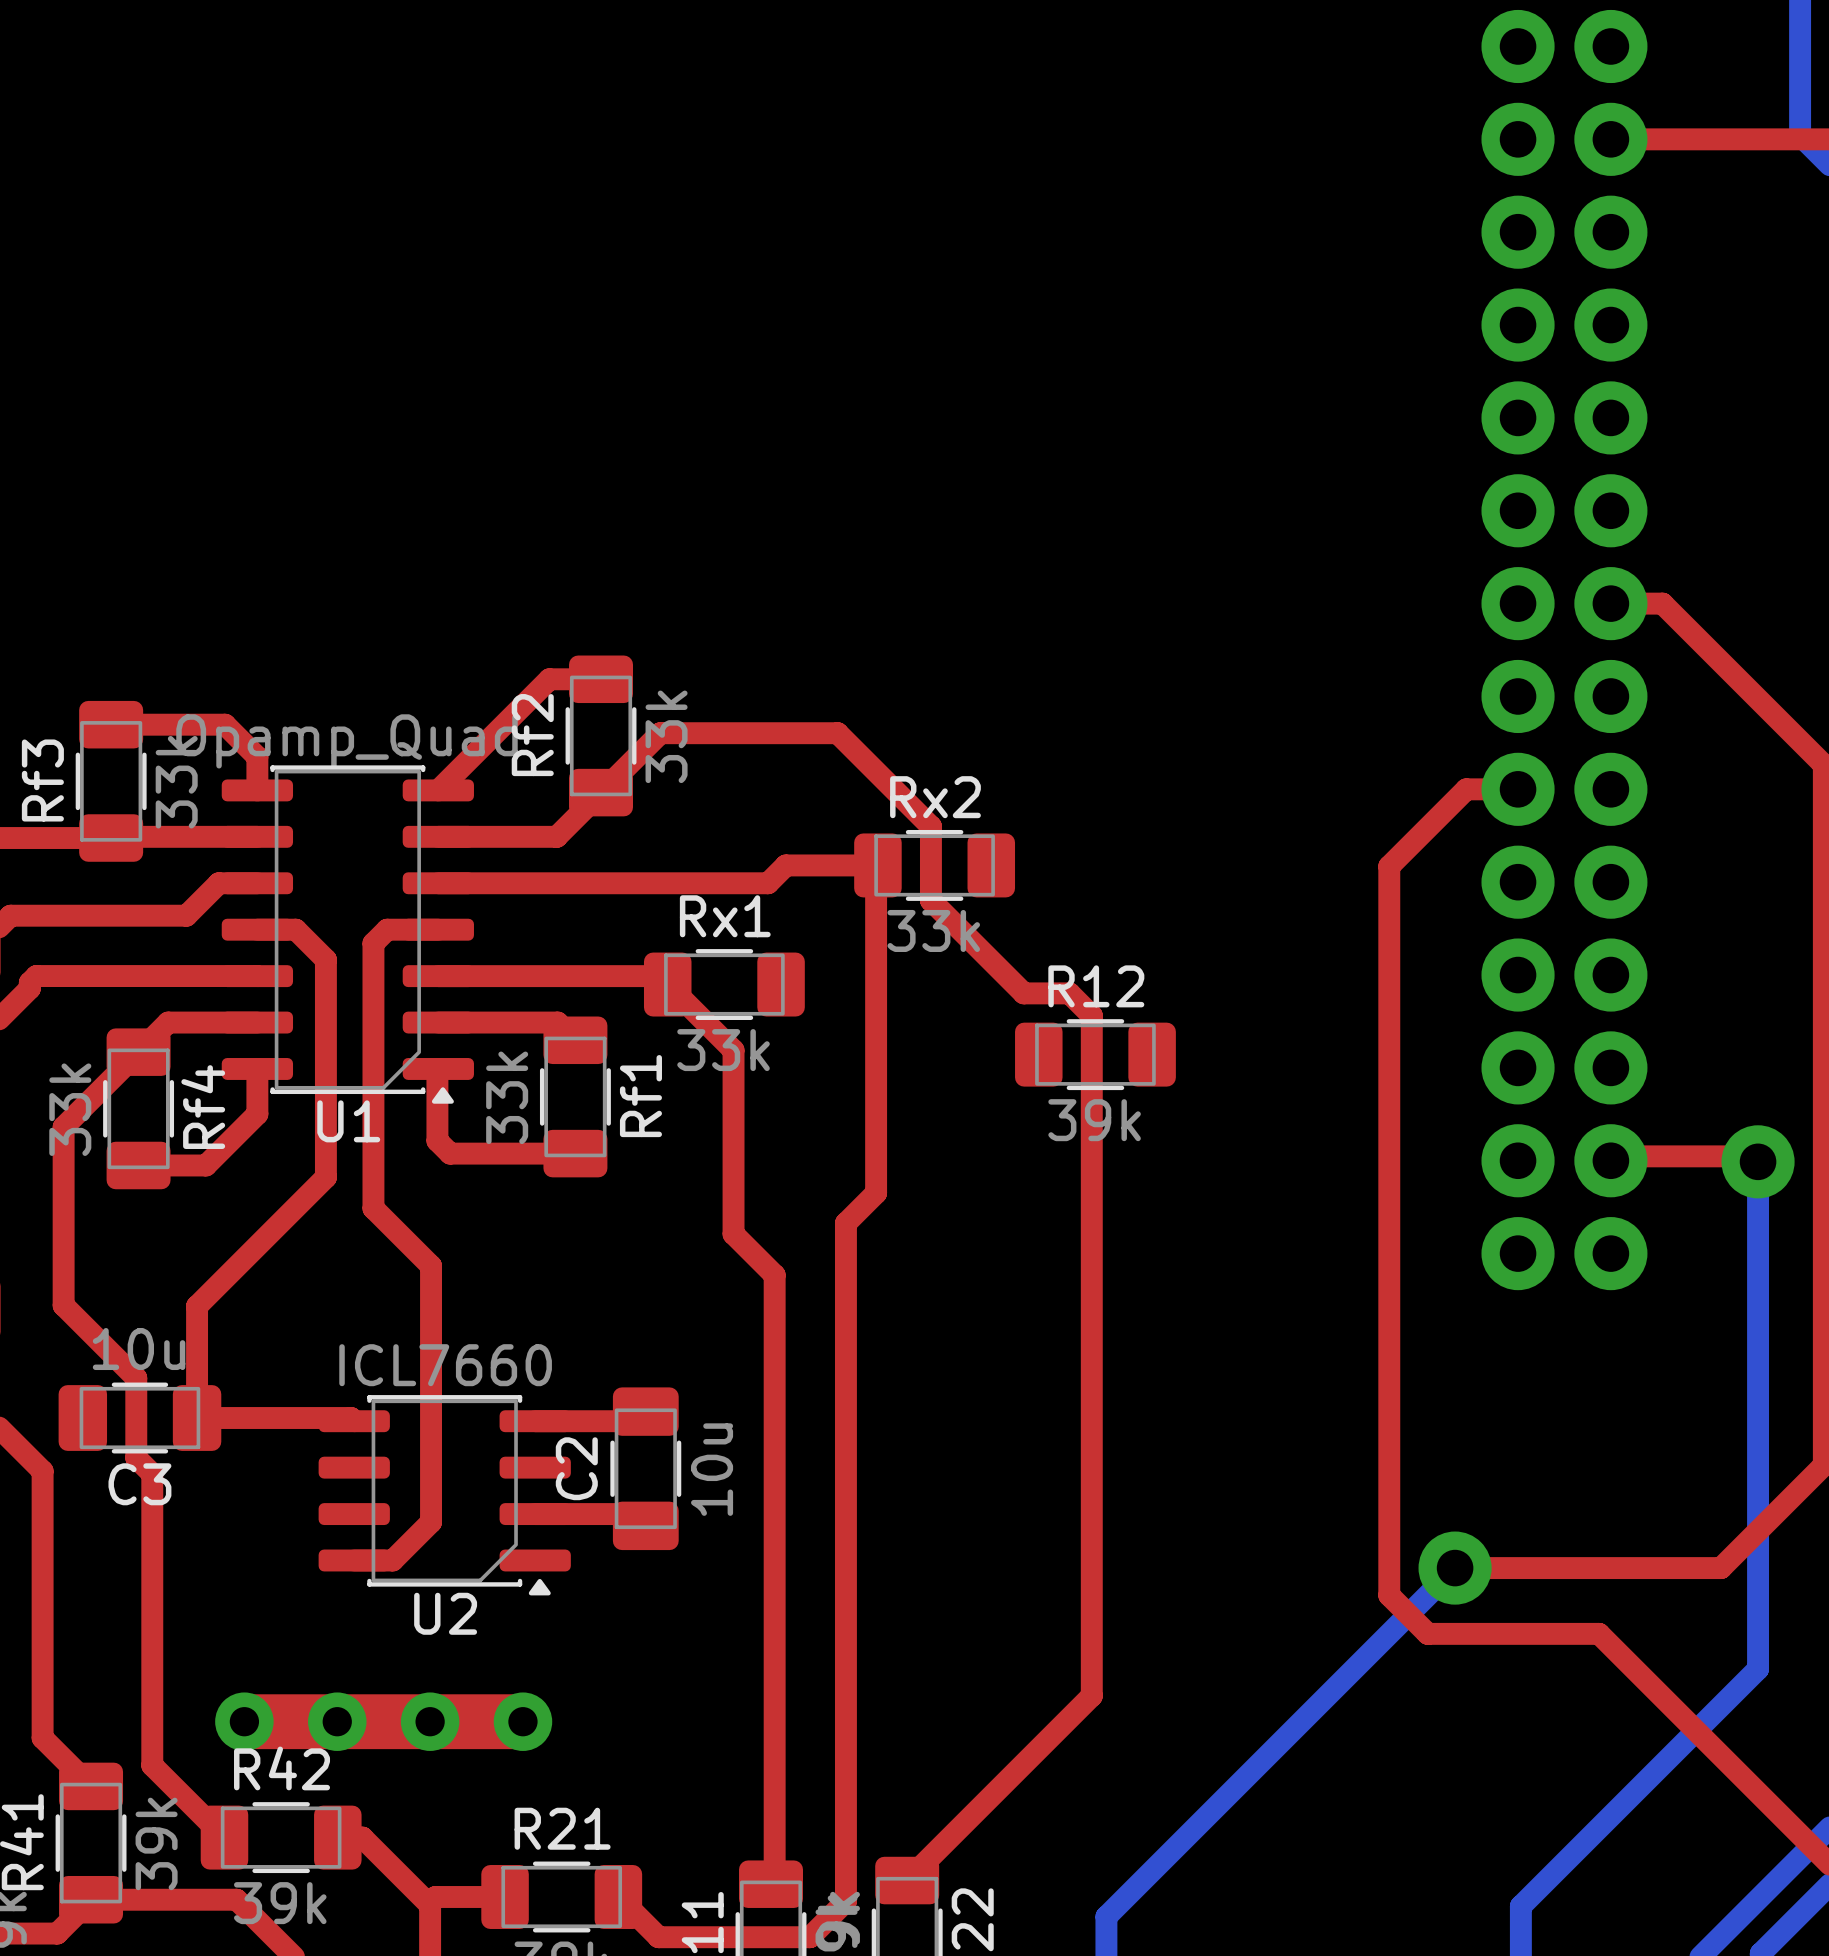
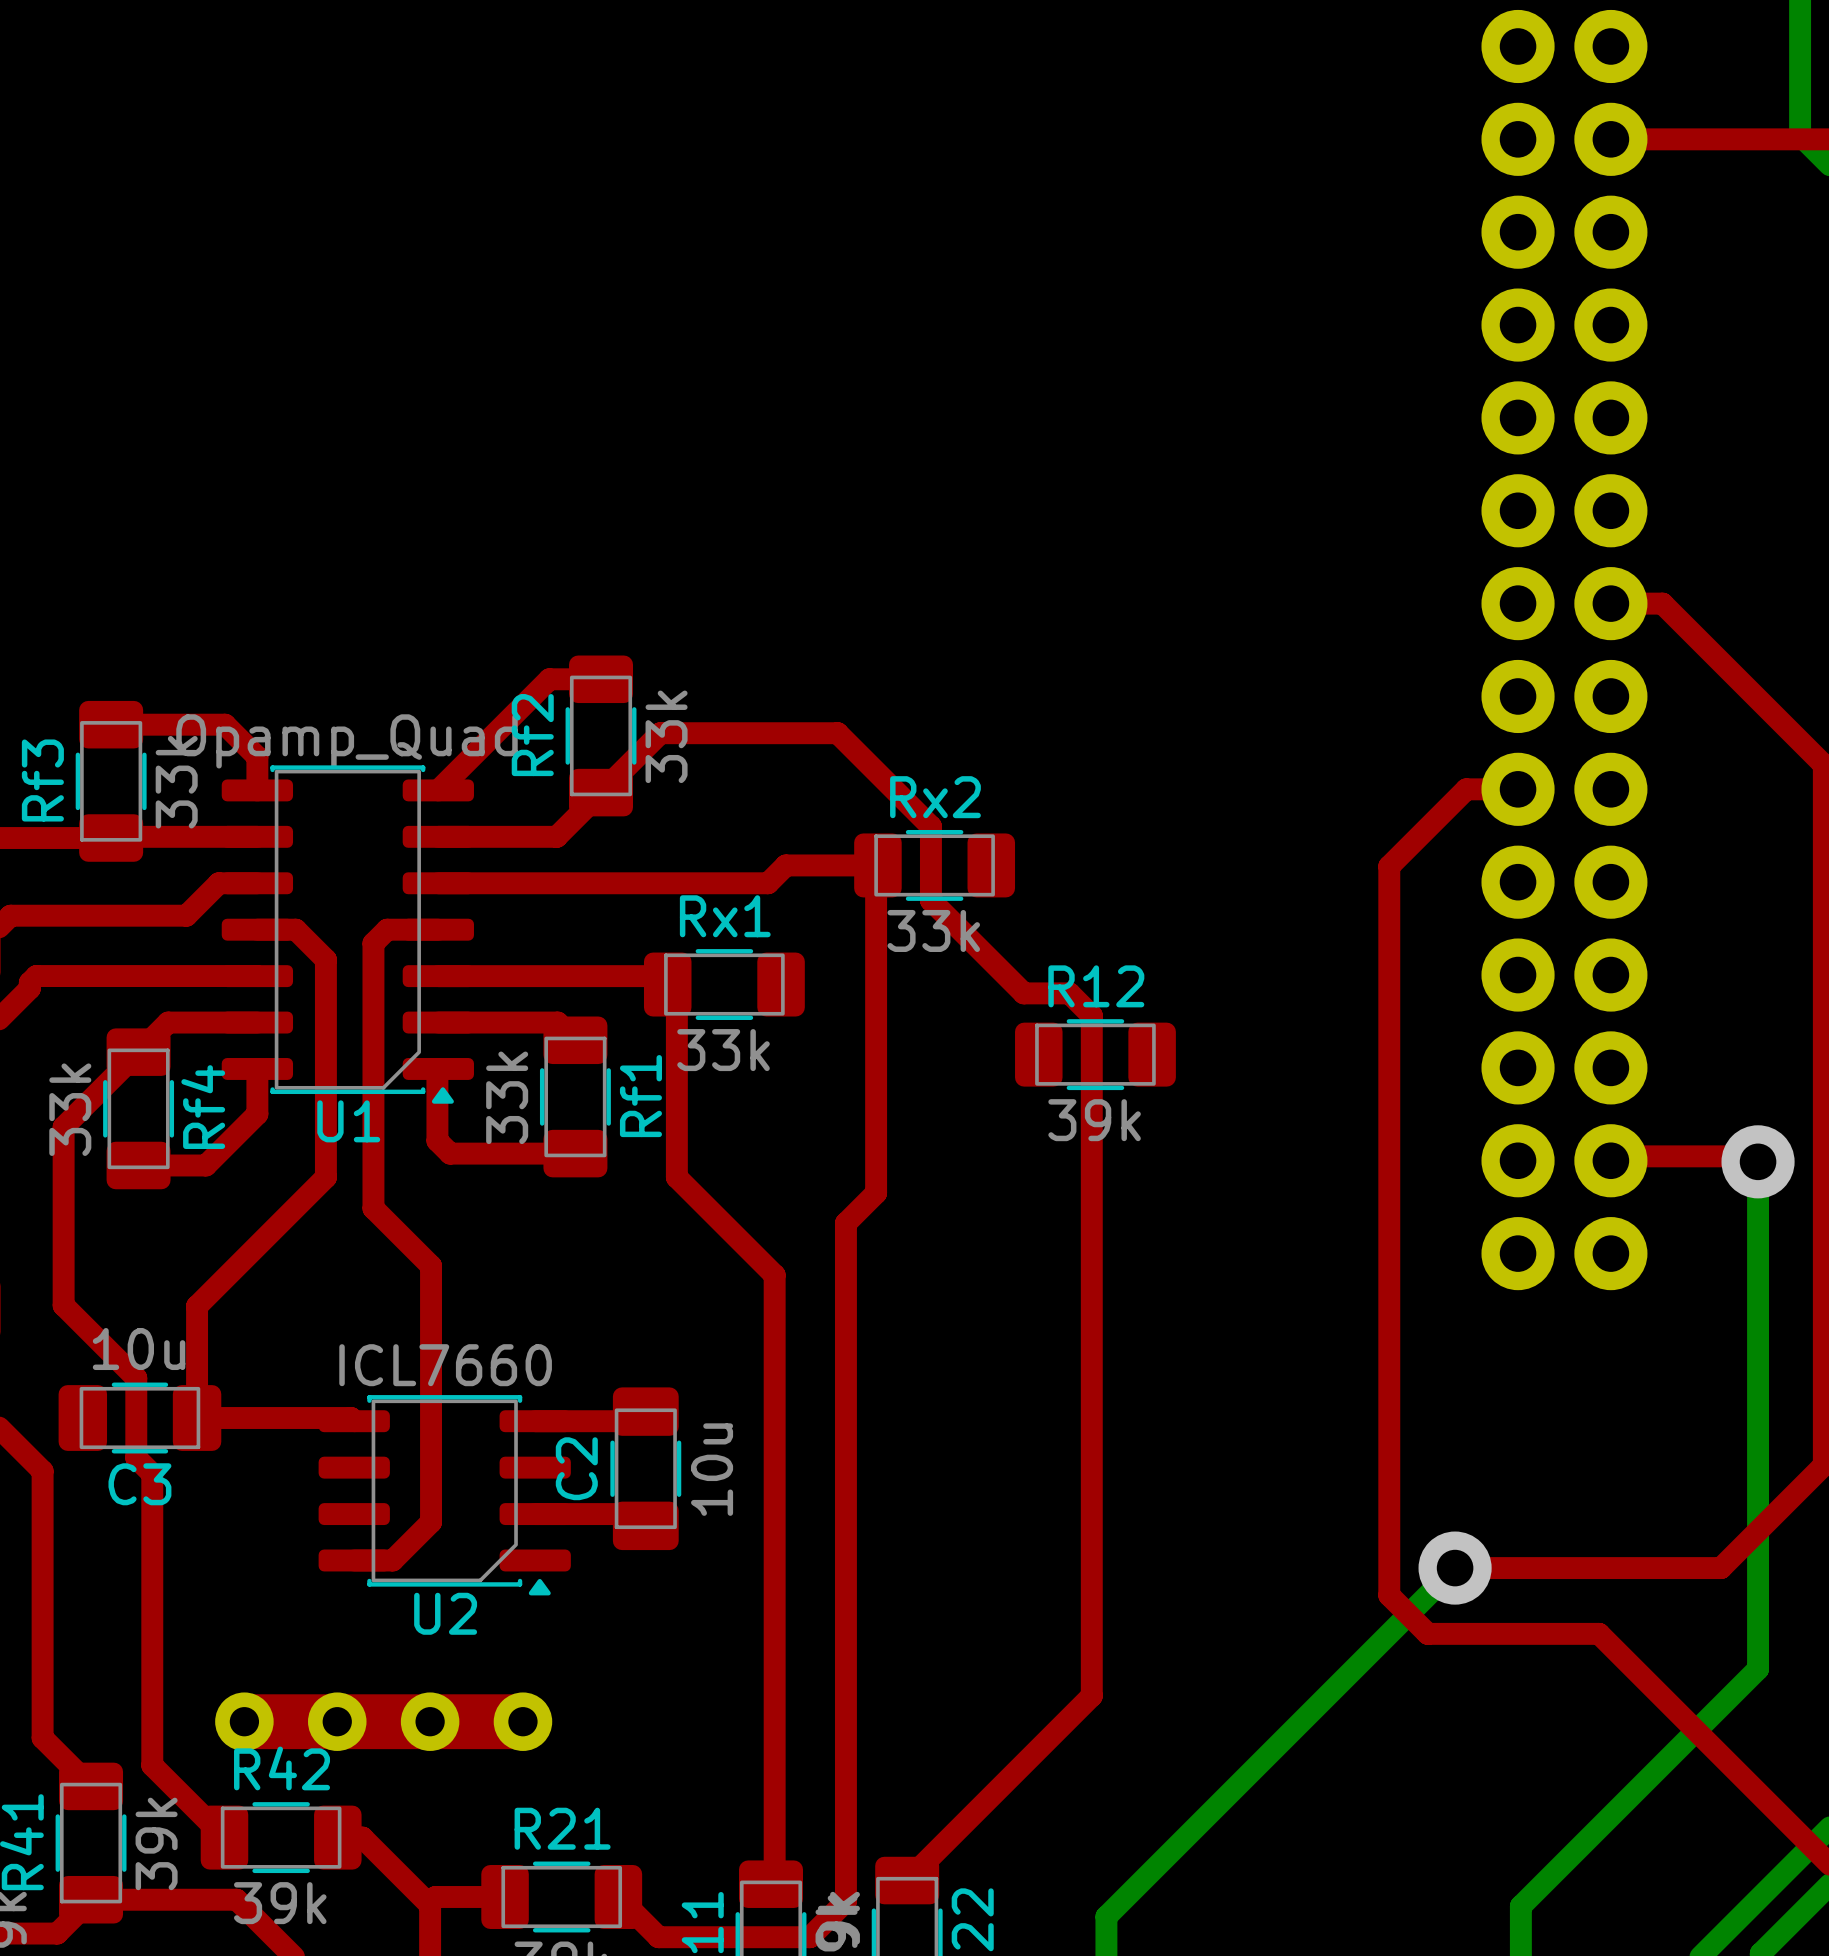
top track: (676, 993) (733, 1050) (733, 1234) -> (676, 993) (676, 1177) (733, 1234)

